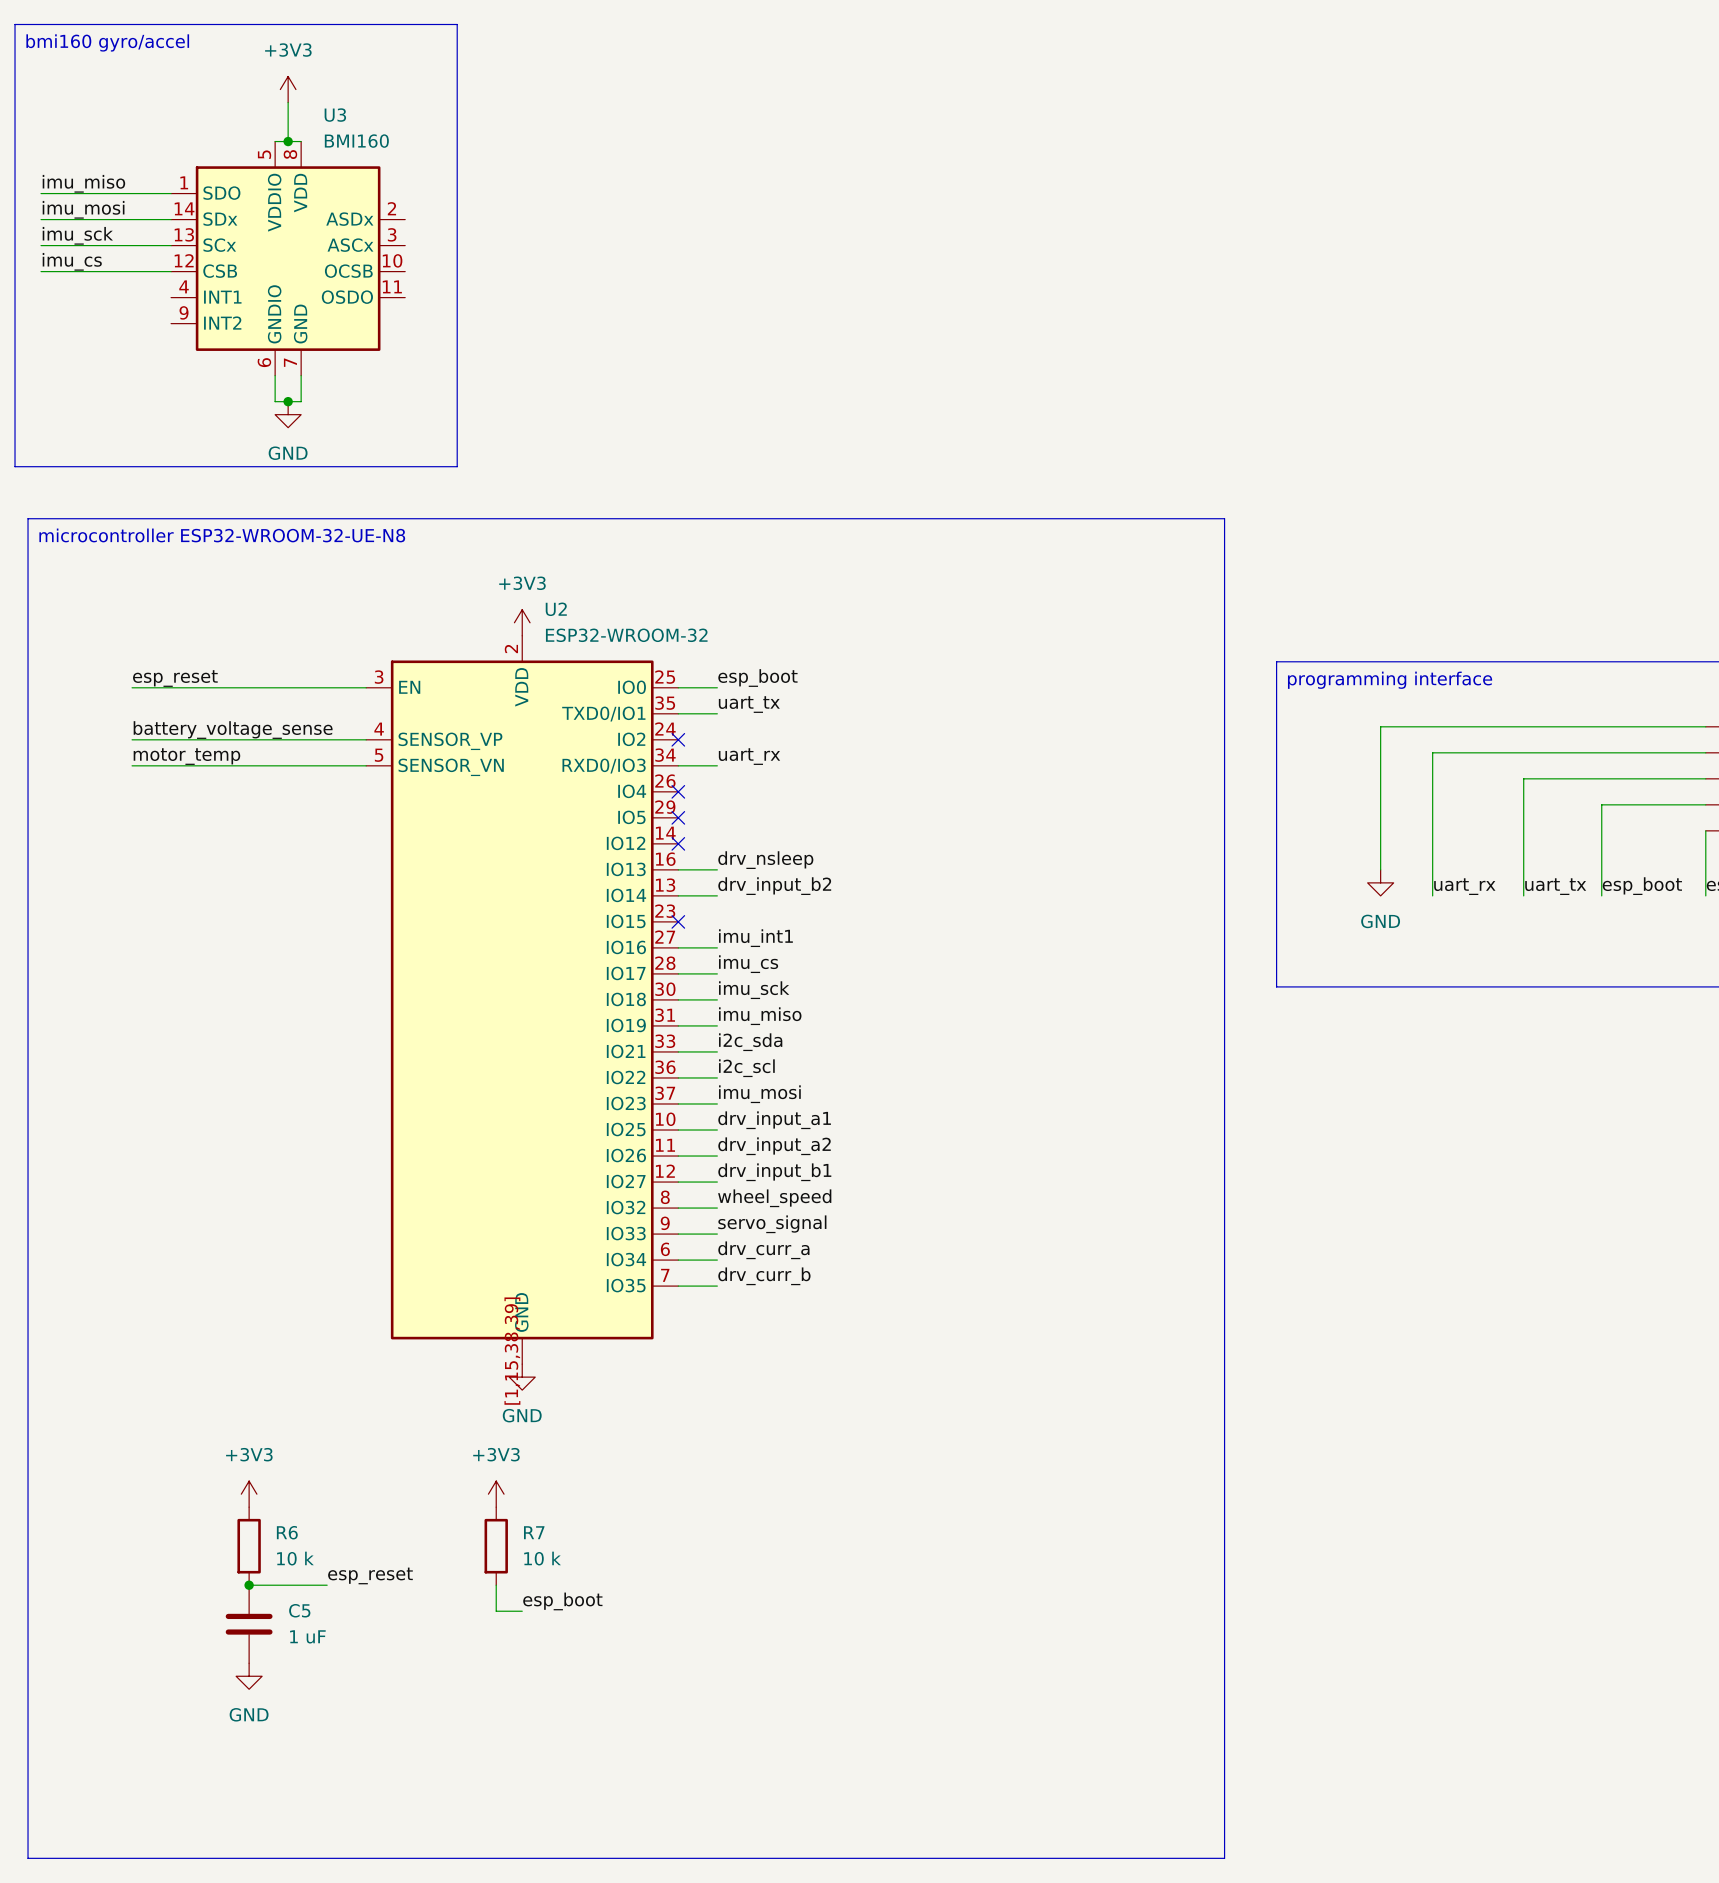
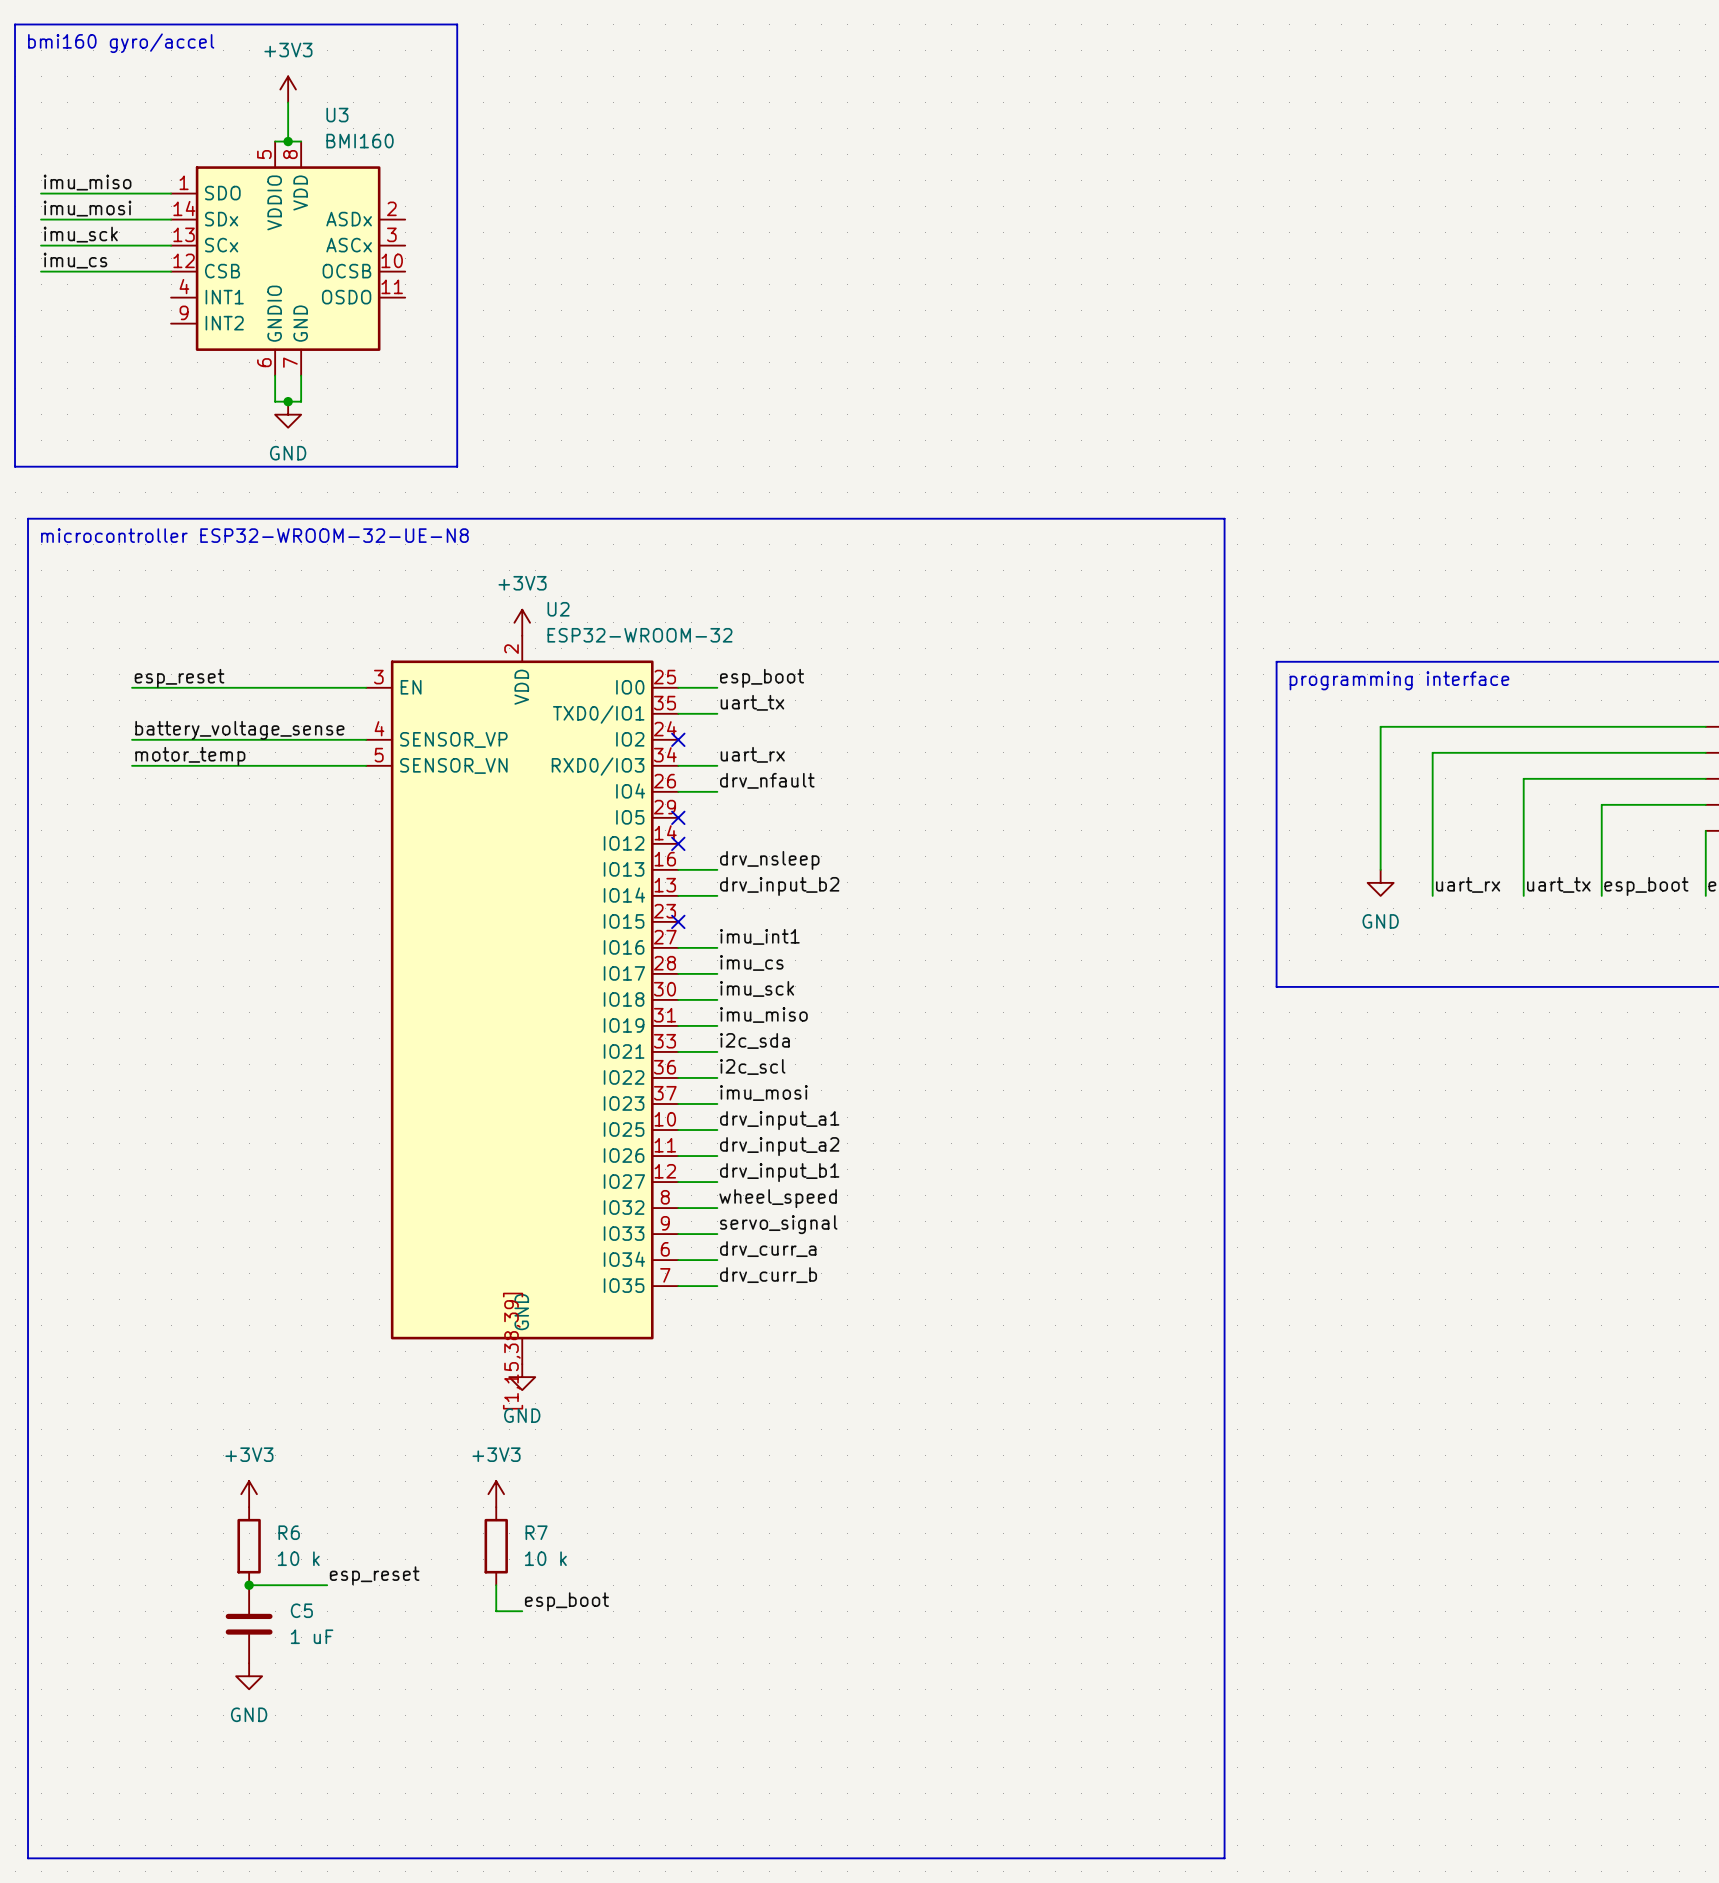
label: none -> drv_nfault (767, 780)
wire: none -> (678, 791) (717, 791)
no-connect mark: (678, 791) -> none

